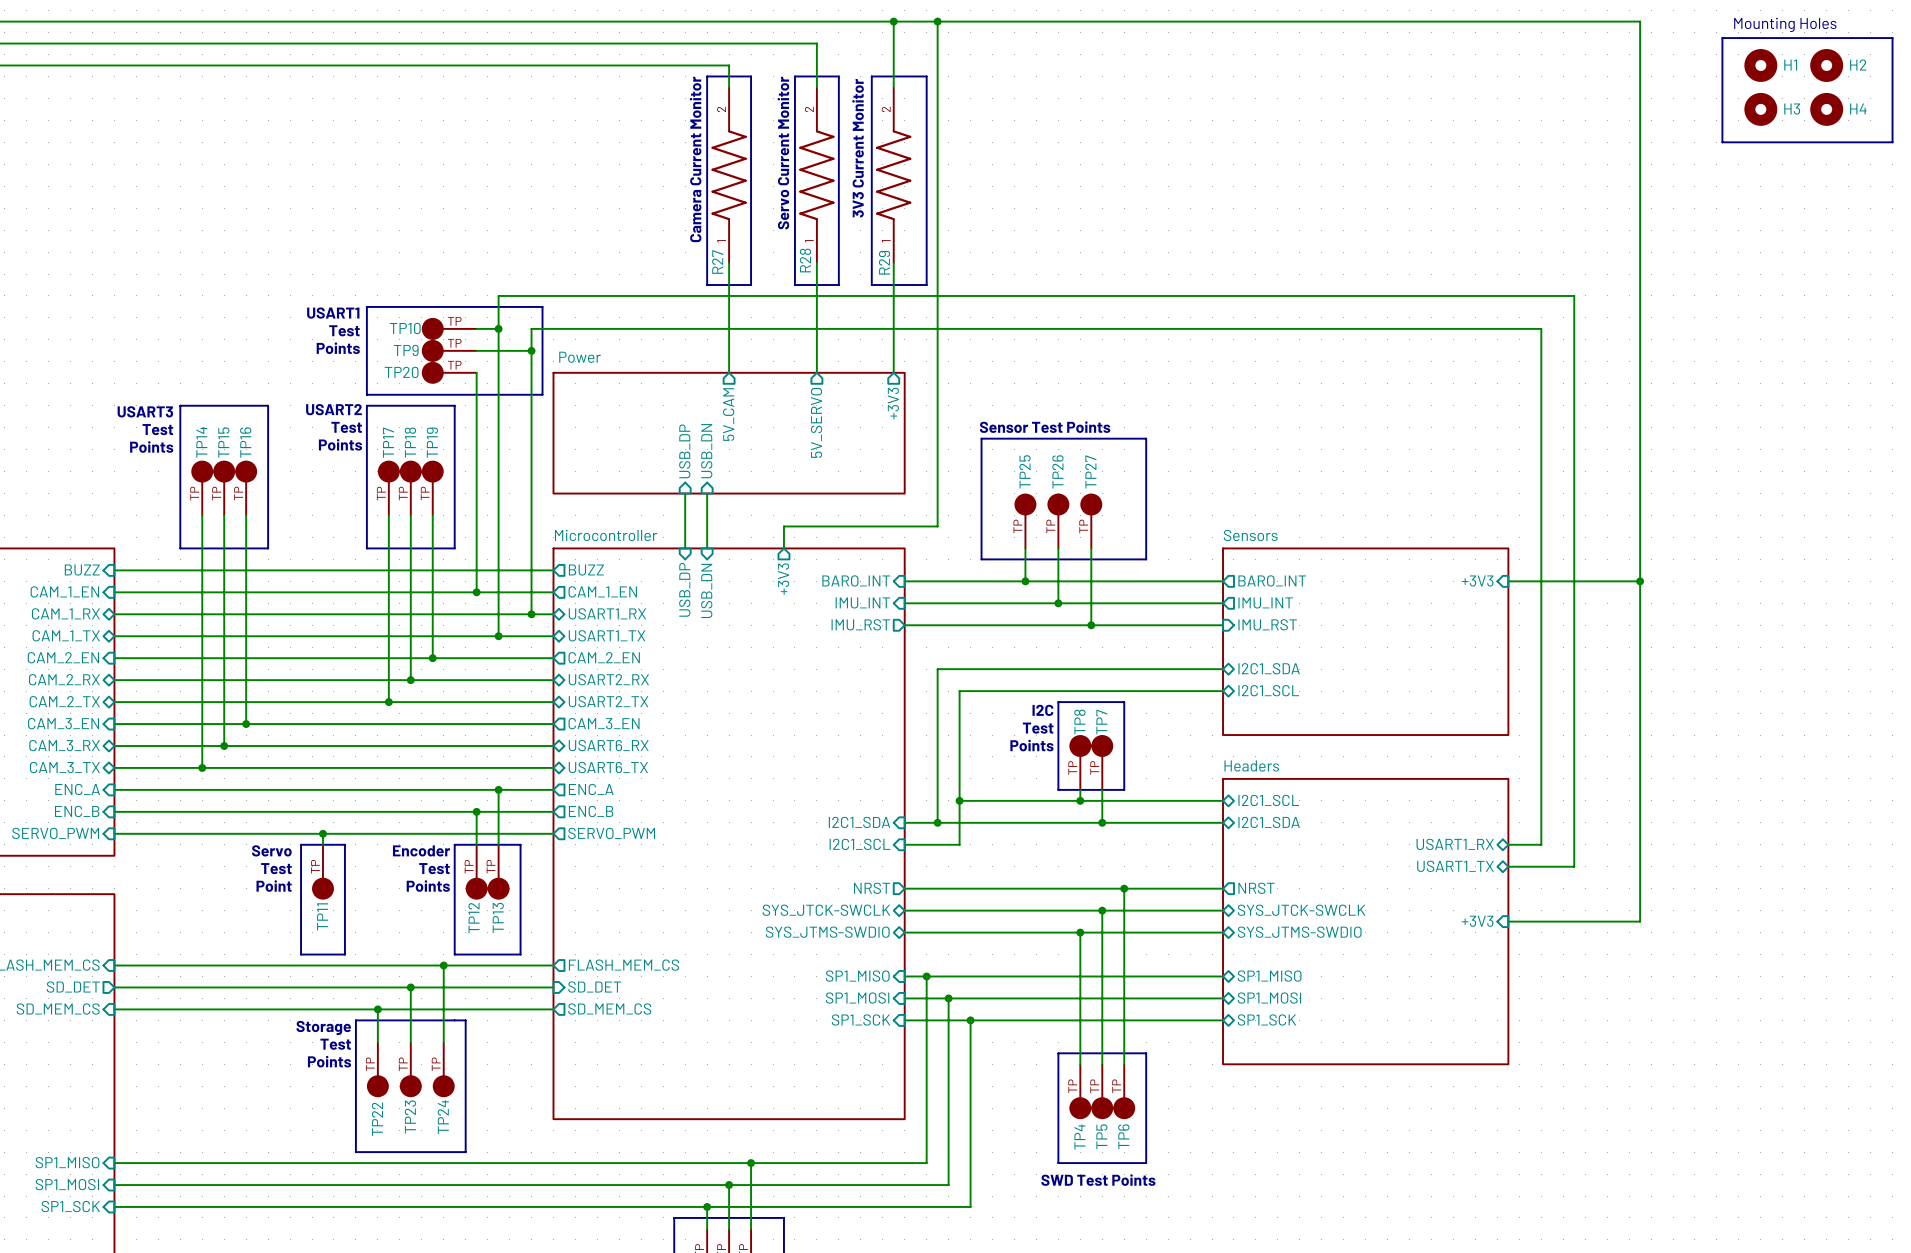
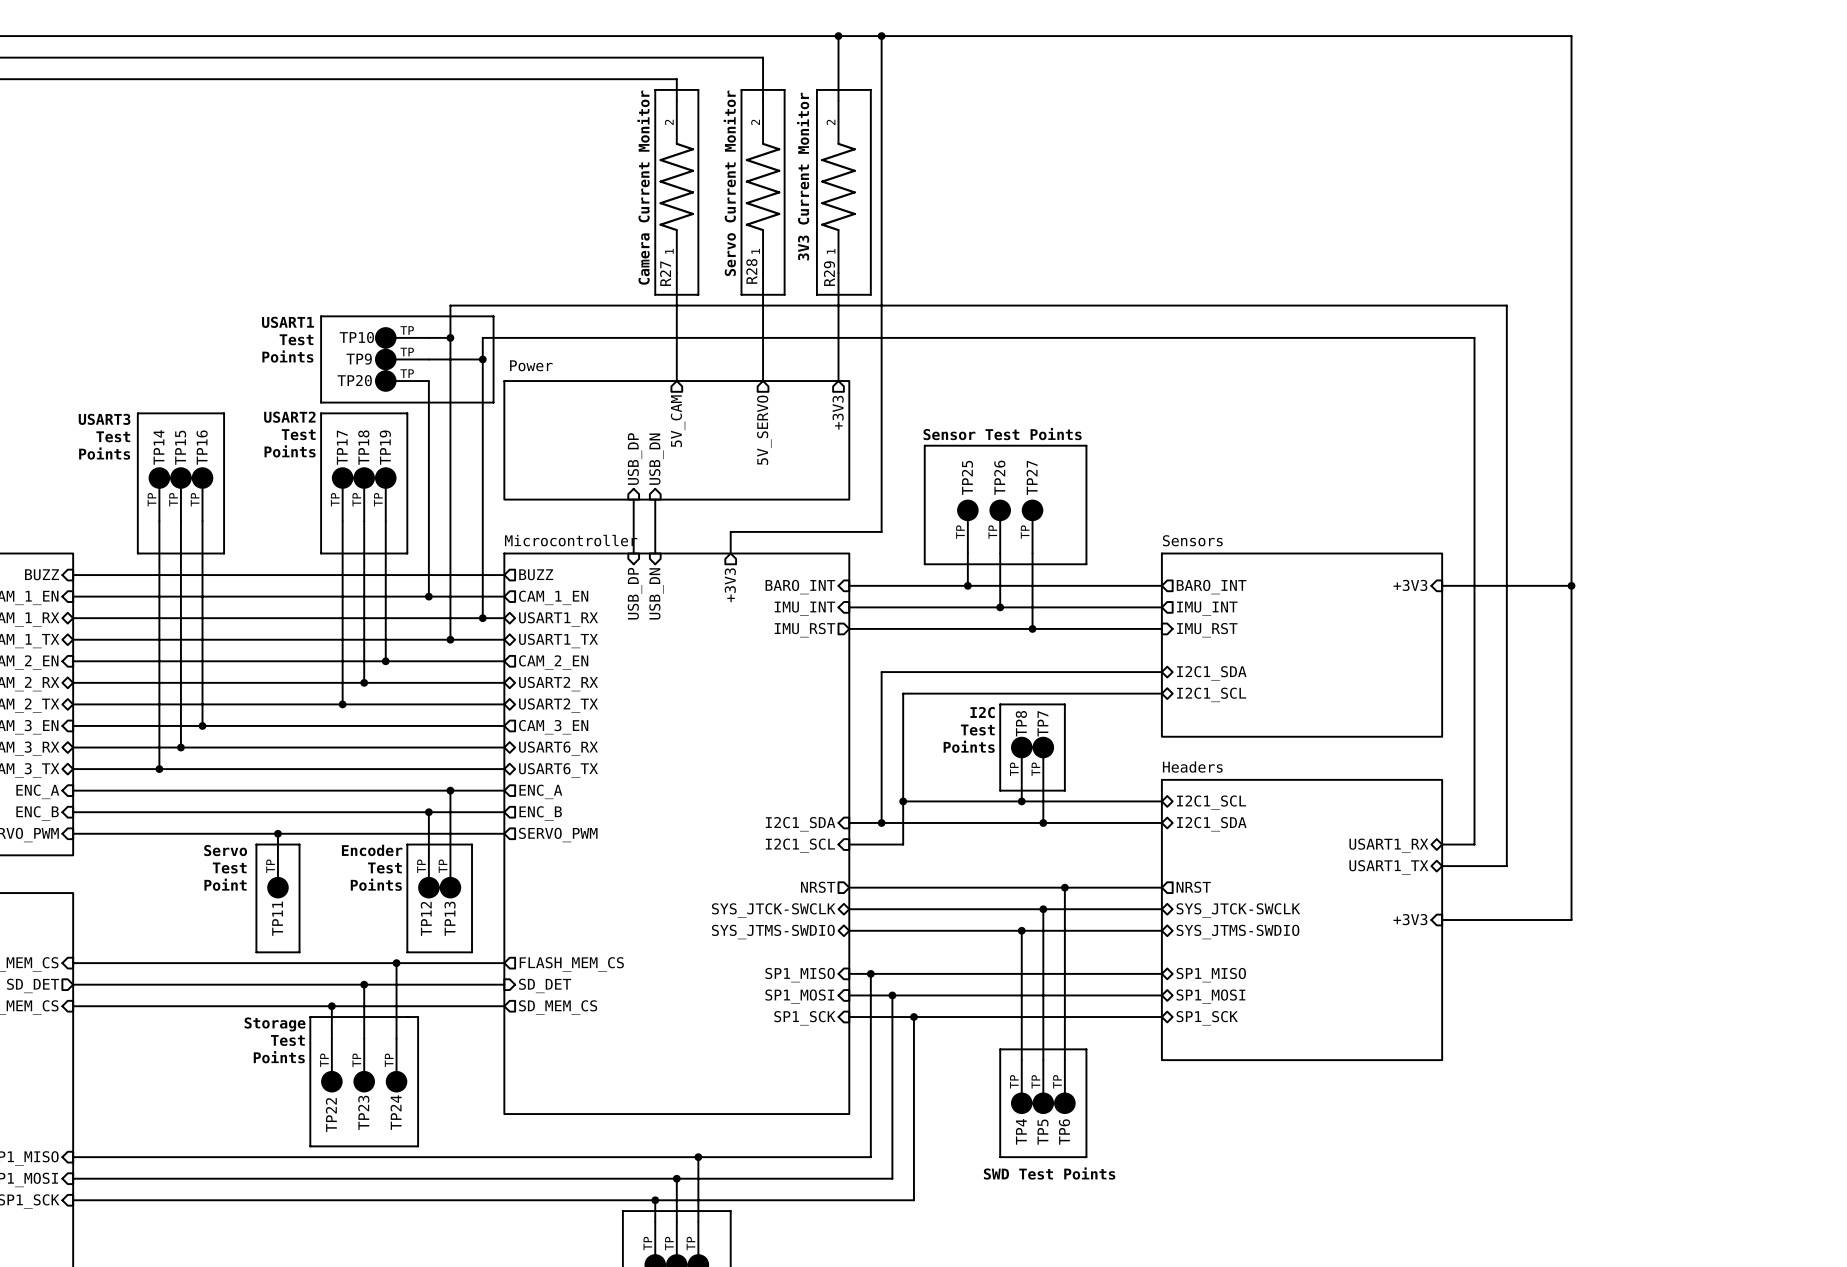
text: Mounting Holes (1785, 24) -> none
line: (1722, 38) (1892, 38) (1892, 142) (1722, 142) (1722, 38) -> none
H1: (1760, 65) -> none
H2: (1826, 65) -> none
H3: (1760, 109) -> none
H4: (1826, 109) -> none

